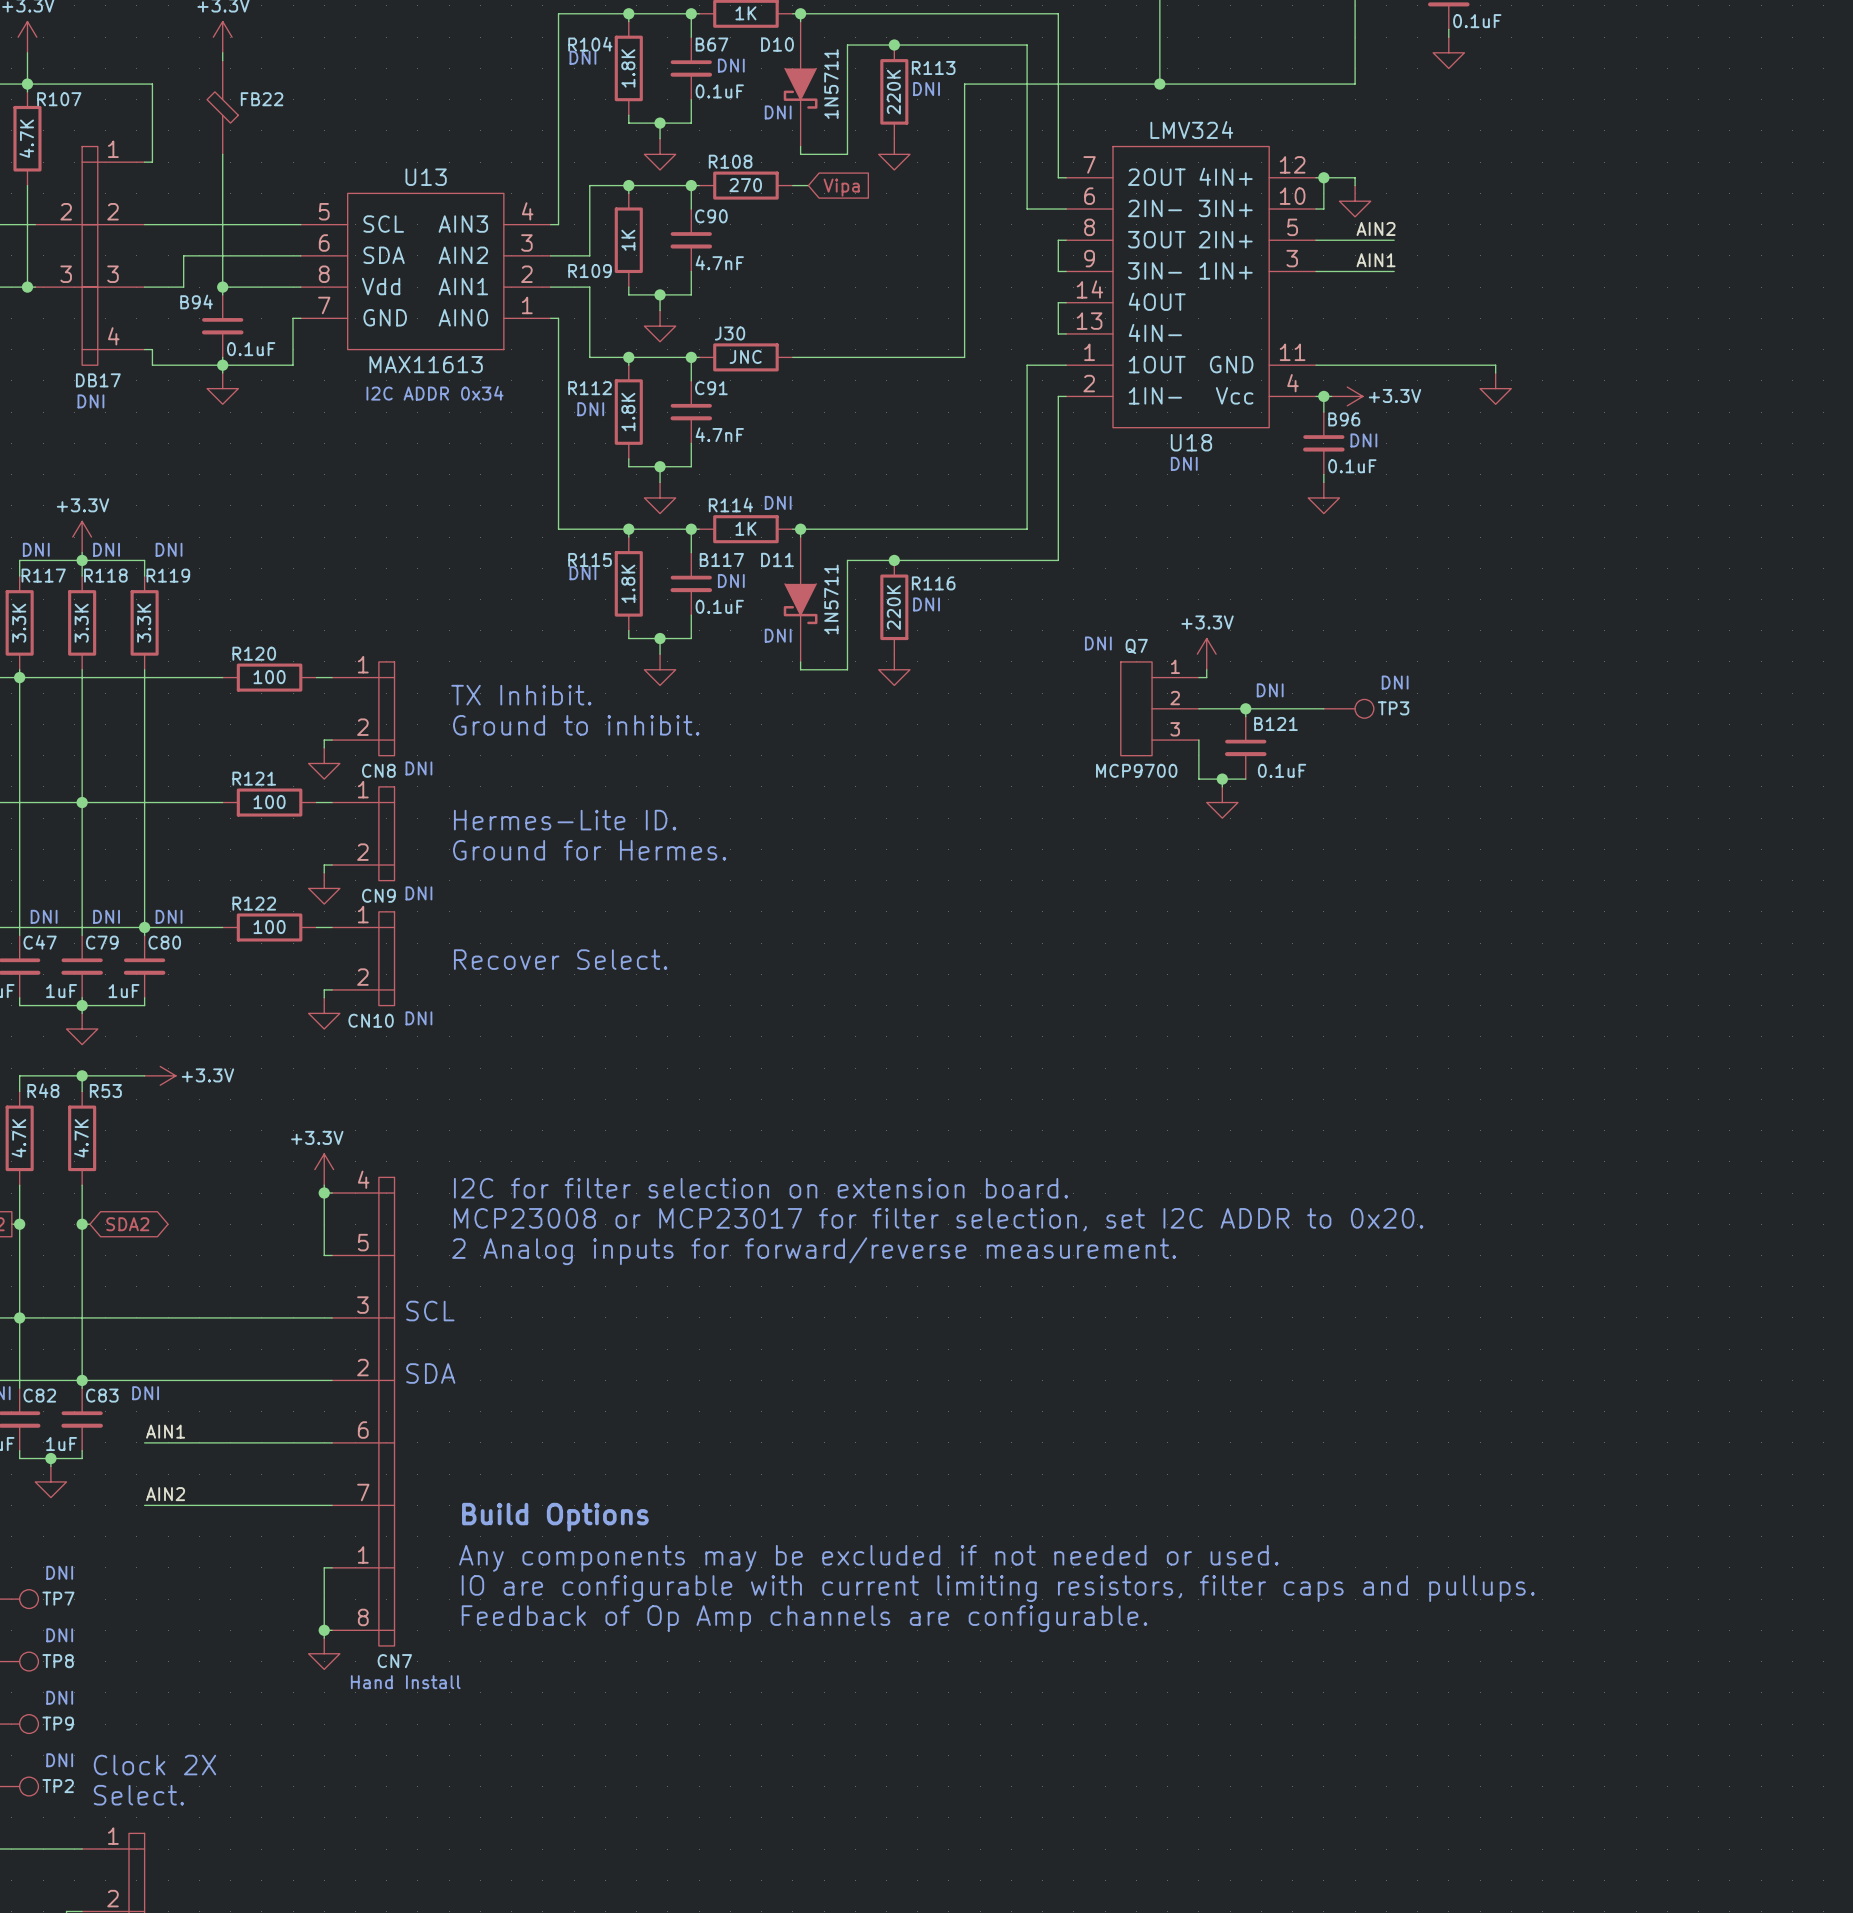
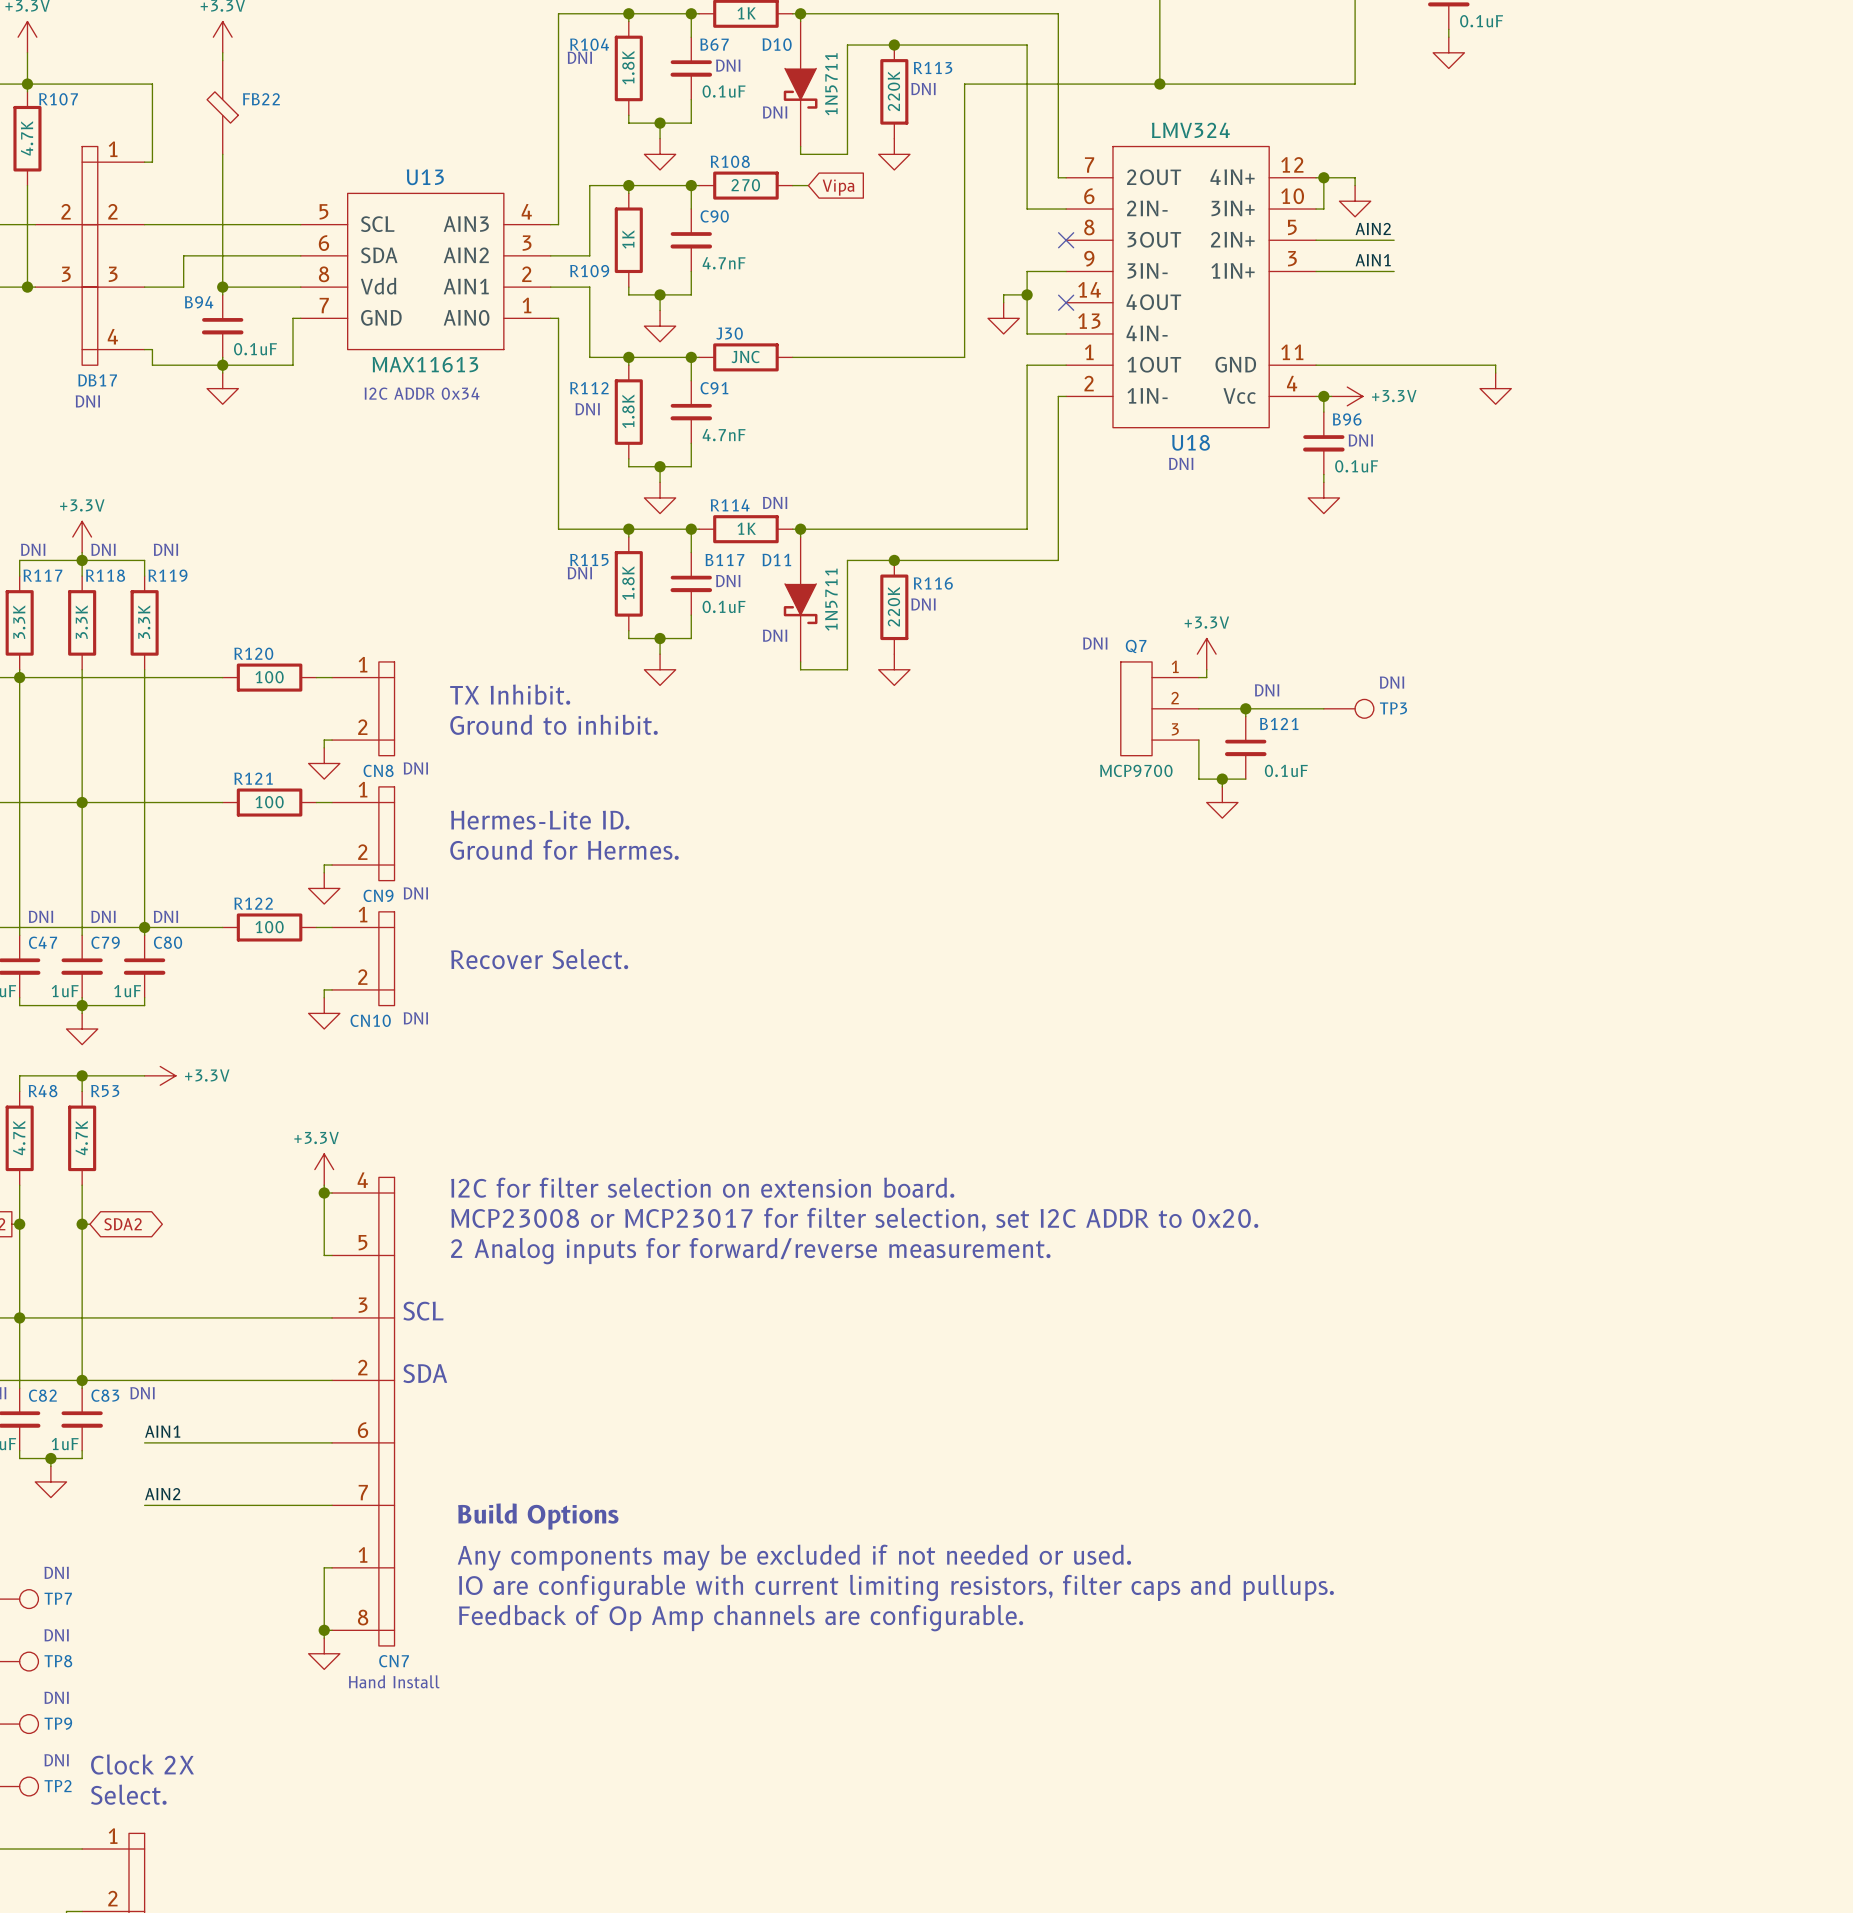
wire: (1066, 240) (1058, 240) (1058, 271) -> none
no-connect mark: none -> (1066, 240)
wire: none -> (1027, 294) (1003, 294) (1003, 302)
junction: none -> (1027, 294)
wire: (1066, 302) (1058, 302) (1058, 333) -> (1058, 271) (1027, 271) (1027, 333) (1058, 333)
no-connect mark: none -> (1066, 302)
power symbol: none -> (1003, 318)

